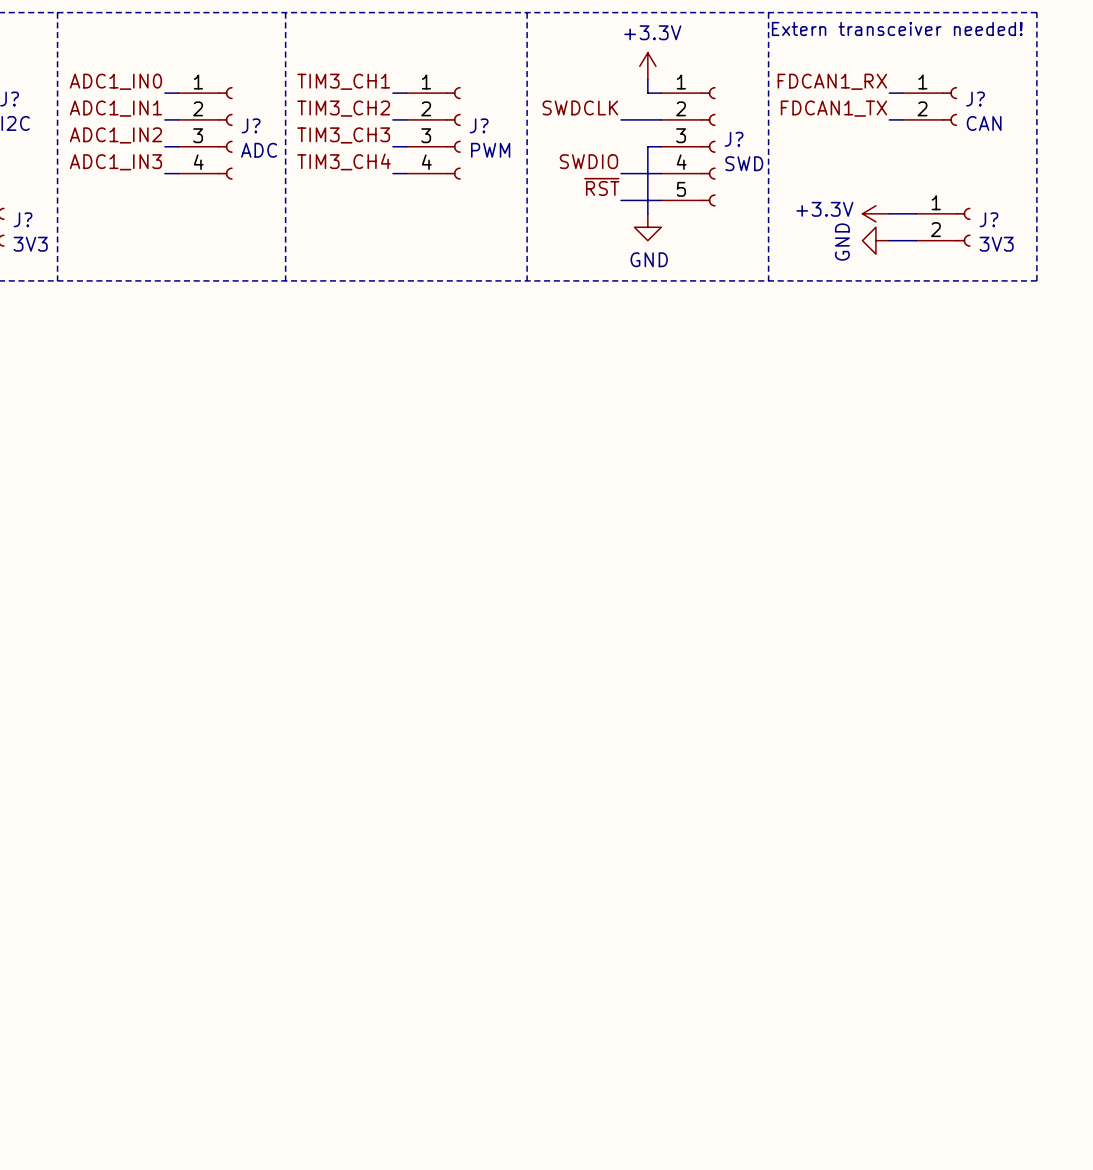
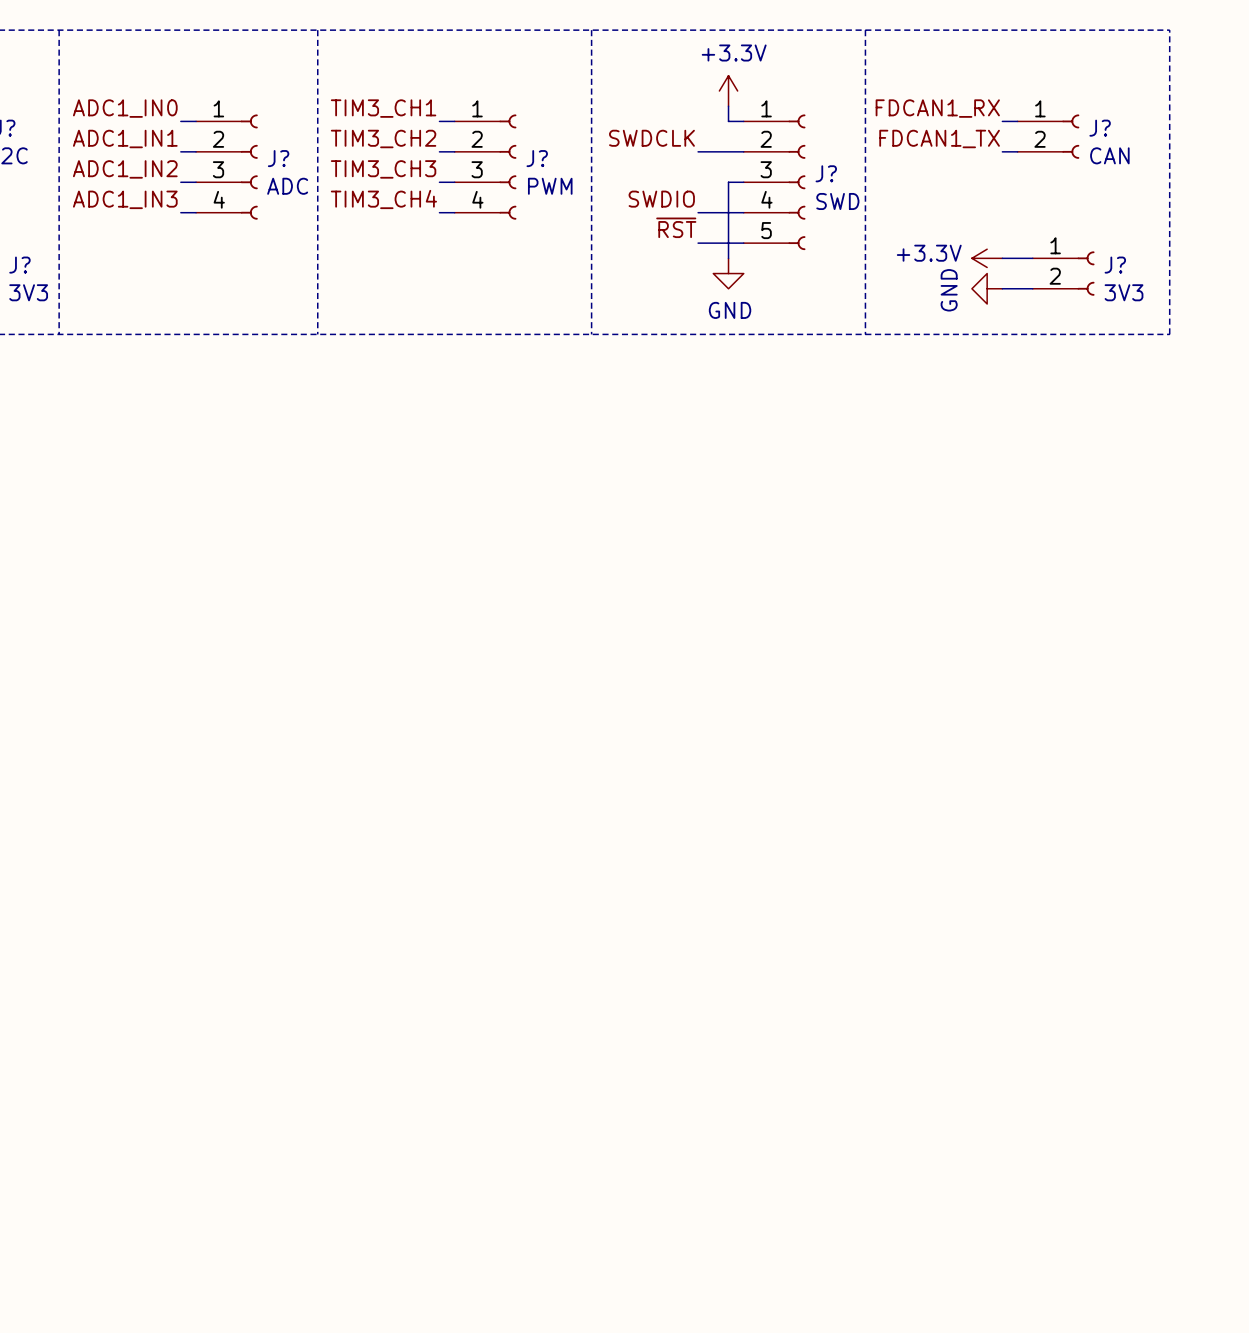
text: Extern transceiver needed! (897, 28) -> none

